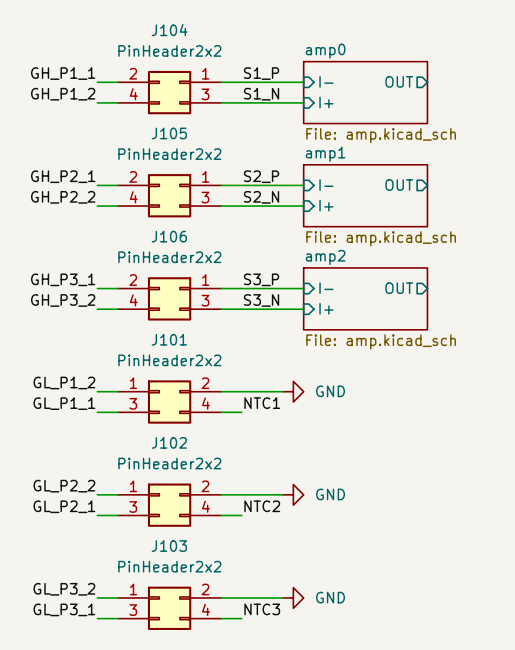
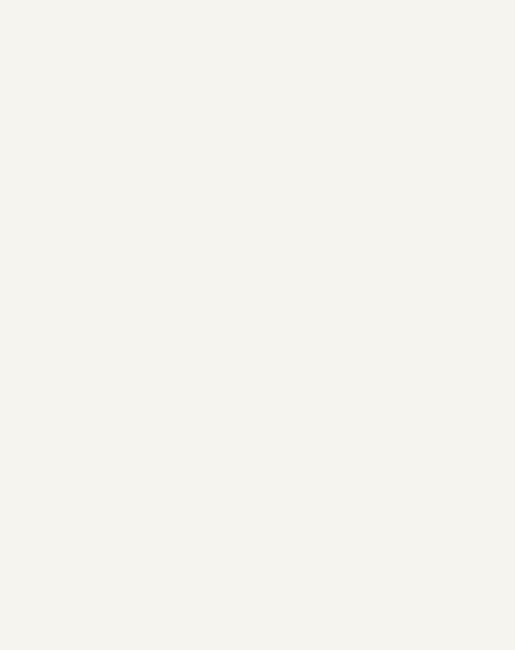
label: GH_P1_1 (63, 73) -> none
label: S1_P (261, 73) -> none
sheet pin: I- (326, 81) -> none
sheet pin: OUT (399, 81) -> none
wire: (97, 82) (118, 82) -> none
wire: (221, 82) (303, 82) -> none
J104: PinHeader2x2 (169, 92) -> none
sheet amp0: File: amp.kicad_sch (365, 92) -> none
label: GH_P1_2 (63, 94) -> none
label: S1_N (261, 94) -> none
wire: (97, 102) (118, 102) -> none
wire: (221, 102) (303, 102) -> none
sheet pin: I+ (326, 102) -> none
label: GH_P2_1 (63, 176) -> none
label: S2_P (261, 176) -> none
wire: (97, 185) (118, 185) -> none
wire: (221, 185) (303, 185) -> none
sheet pin: I- (326, 185) -> none
sheet pin: OUT (399, 185) -> none
J105: PinHeader2x2 (169, 195) -> none
sheet amp1: File: amp.kicad_sch (365, 195) -> none
label: GH_P2_2 (63, 197) -> none
label: S2_N (261, 197) -> none
sheet pin: I+ (326, 205) -> none
wire: (97, 206) (118, 206) -> none
wire: (221, 206) (303, 206) -> none
label: GH_P3_1 (63, 279) -> none
label: S3_P (261, 279) -> none
wire: (97, 288) (118, 288) -> none
wire: (221, 288) (303, 288) -> none
sheet pin: I- (326, 288) -> none
sheet pin: OUT (399, 288) -> none
J106: PinHeader2x2 (169, 298) -> none
sheet amp2: File: amp.kicad_sch (365, 298) -> none
label: GH_P3_2 (63, 300) -> none
label: S3_N (261, 300) -> none
sheet pin: I+ (326, 308) -> none
wire: (97, 309) (118, 309) -> none
wire: (221, 309) (303, 309) -> none
label: GL_P1_2 (64, 382) -> none
wire: (97, 391) (118, 391) -> none
wire: (221, 391) (283, 391) -> none
power symbol: GND (293, 391) -> none
J101: PinHeader2x2 (169, 402) -> none
label: GL_P1_1 (64, 403) -> none
label: NTC1 (262, 403) -> none
wire: (97, 412) (118, 412) -> none
wire: (221, 412) (241, 412) -> none
label: GL_P2_2 (64, 486) -> none
wire: (97, 494) (118, 494) -> none
wire: (221, 494) (283, 494) -> none
power symbol: GND (293, 494) -> none
J102: PinHeader2x2 (169, 505) -> none
label: GL_P2_1 (64, 506) -> none
label: NTC2 (262, 506) -> none
wire: (97, 515) (118, 515) -> none
wire: (221, 515) (241, 515) -> none
label: GL_P3_2 (64, 589) -> none
wire: (97, 597) (118, 597) -> none
wire: (221, 597) (283, 597) -> none
power symbol: GND (293, 597) -> none
J103: PinHeader2x2 (169, 608) -> none
label: GL_P3_1 (64, 609) -> none
label: NTC3 (262, 609) -> none
wire: (97, 618) (118, 618) -> none
wire: (221, 618) (241, 618) -> none

